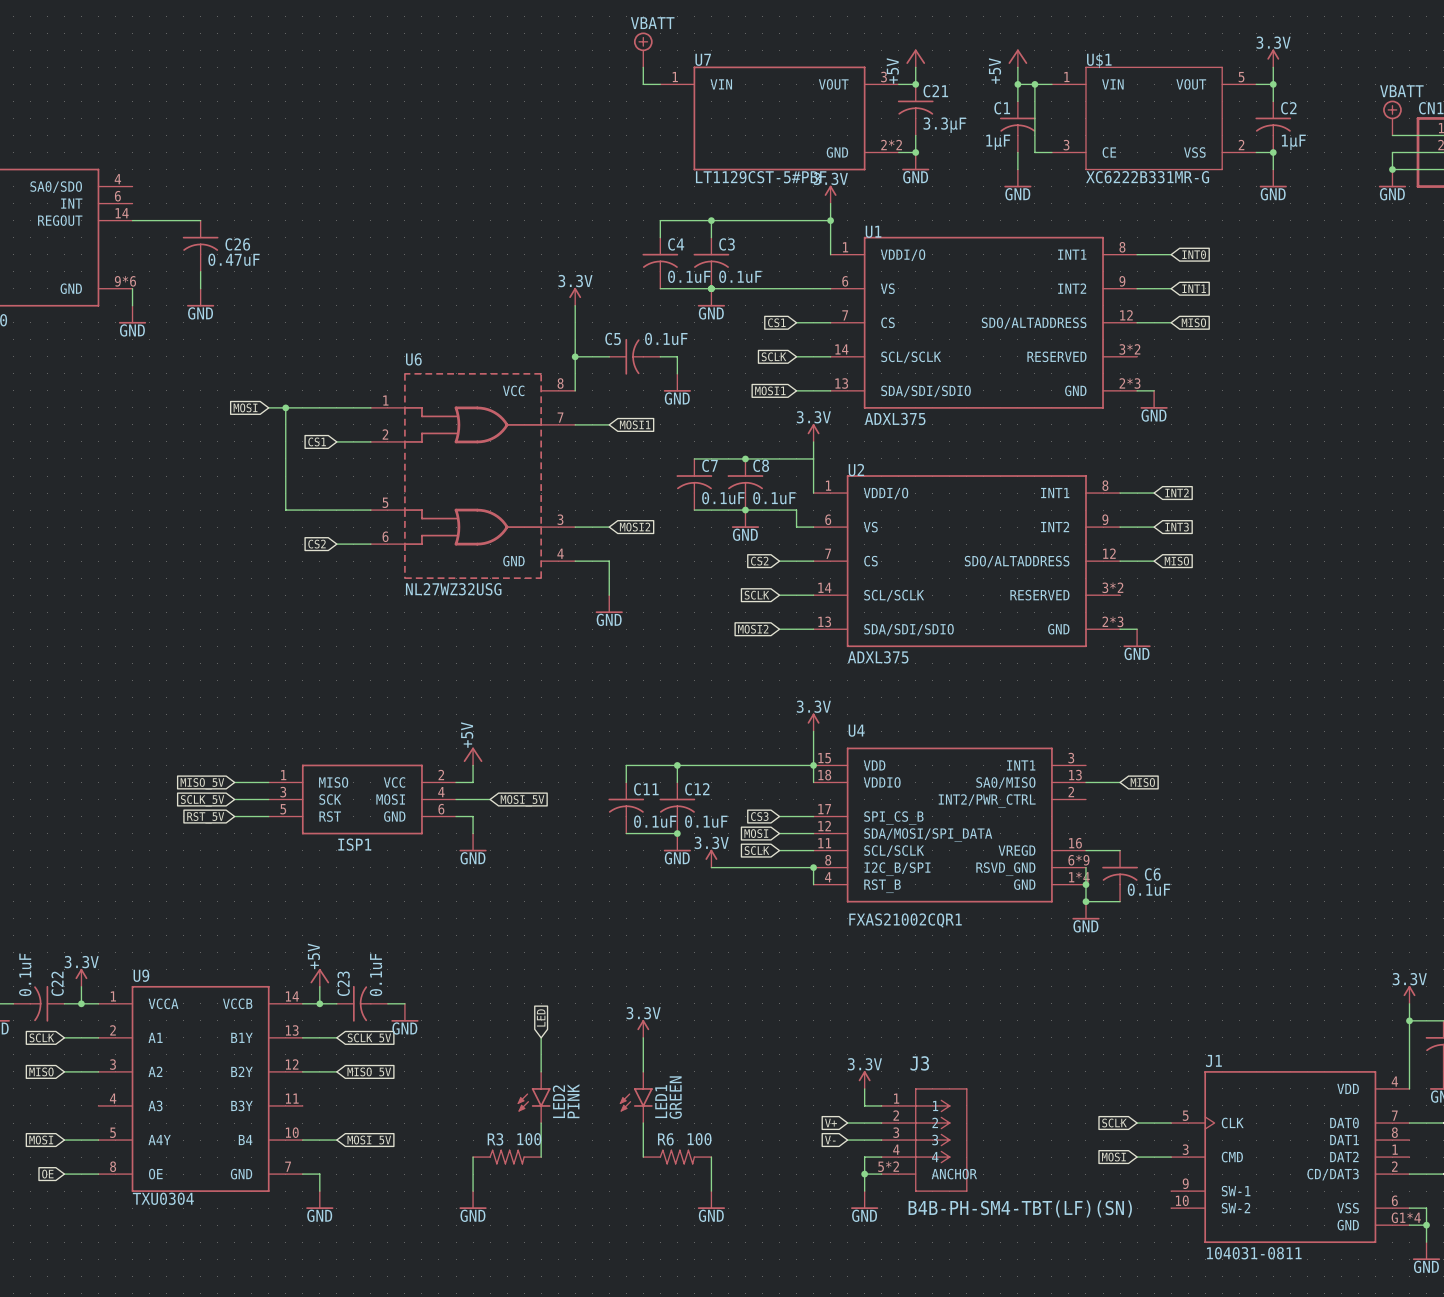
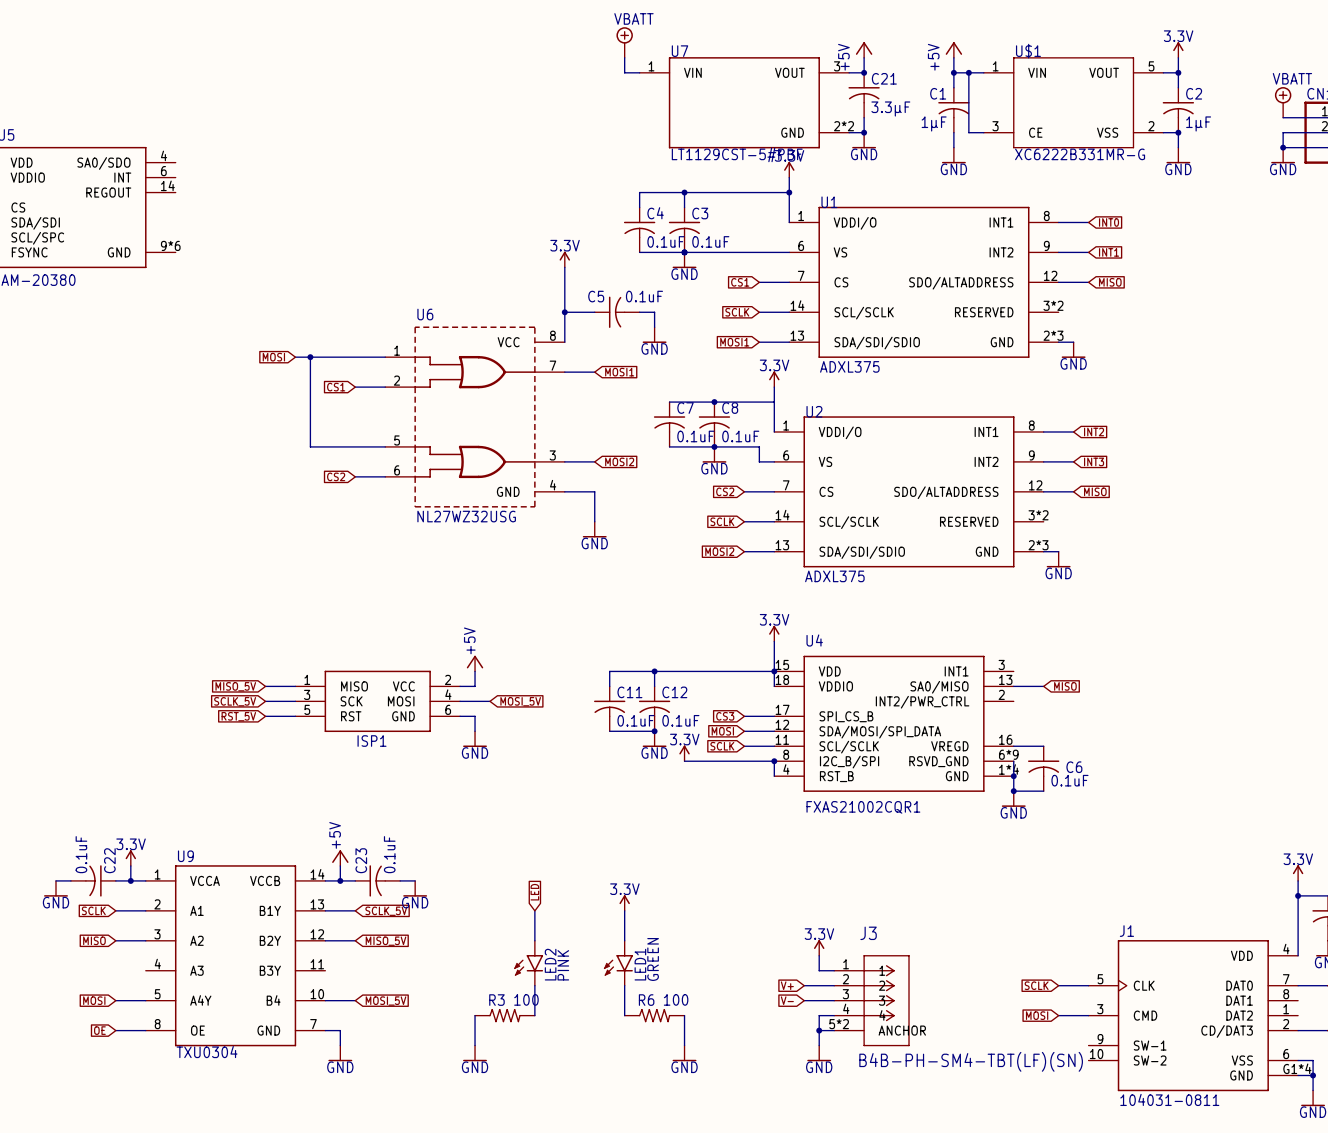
wire: (132, 220) (200, 220) -> none
C26: 0.47uF (200, 246) -> none
wire: (200, 271) (200, 288) -> none
wire: (132, 288) (132, 305) -> none
power symbol: GND (200, 297) -> none
power symbol: GND (132, 314) -> none

